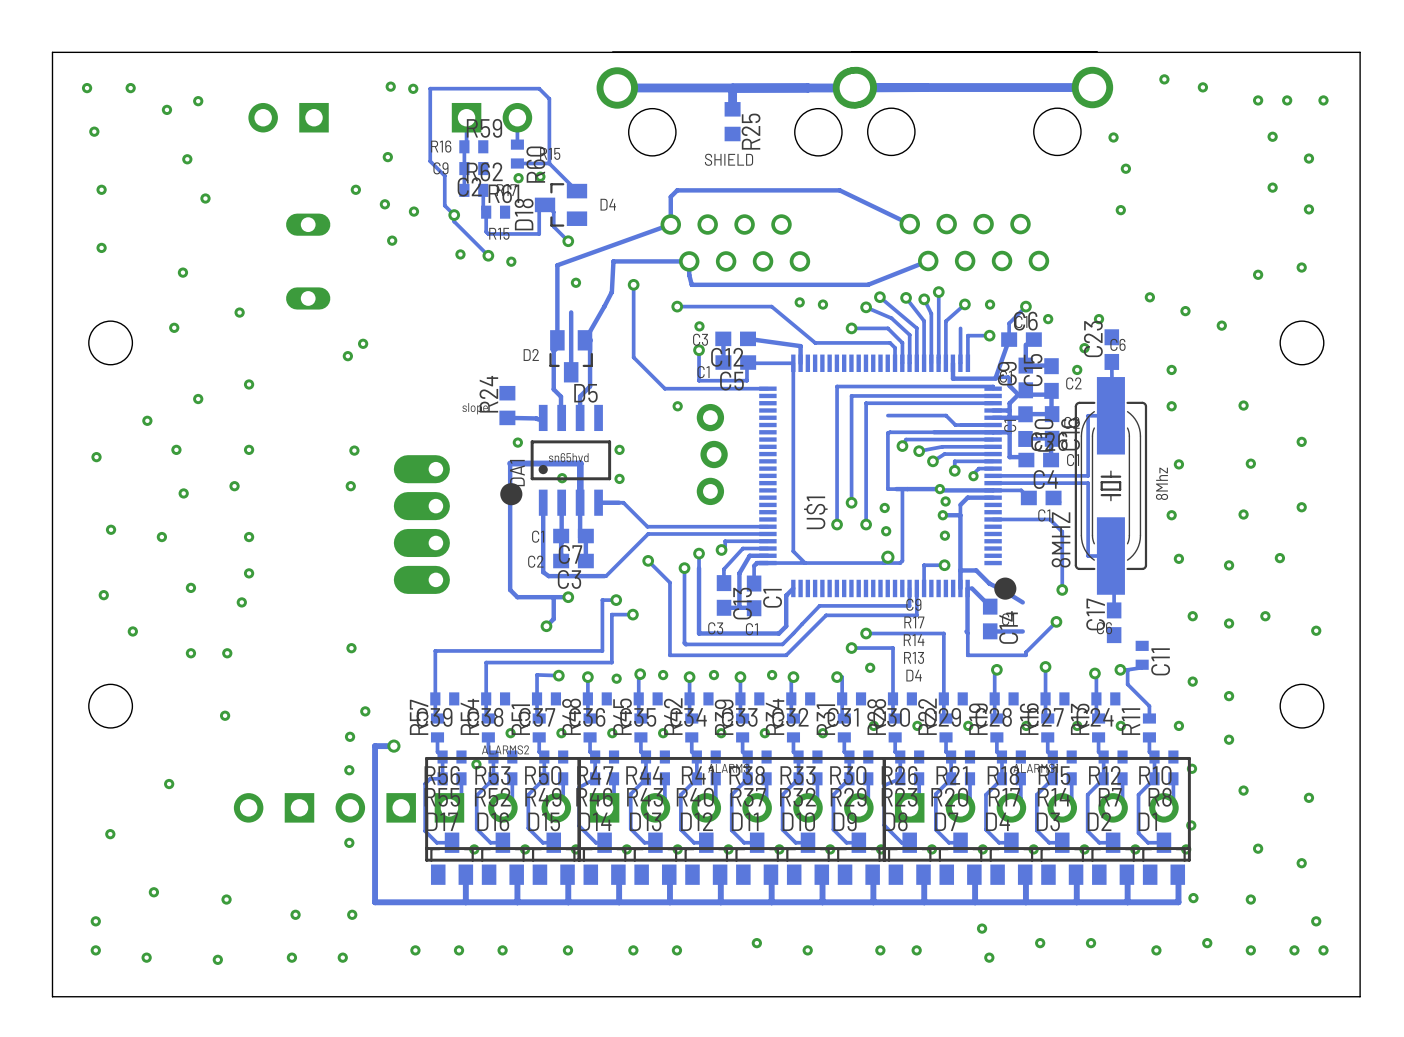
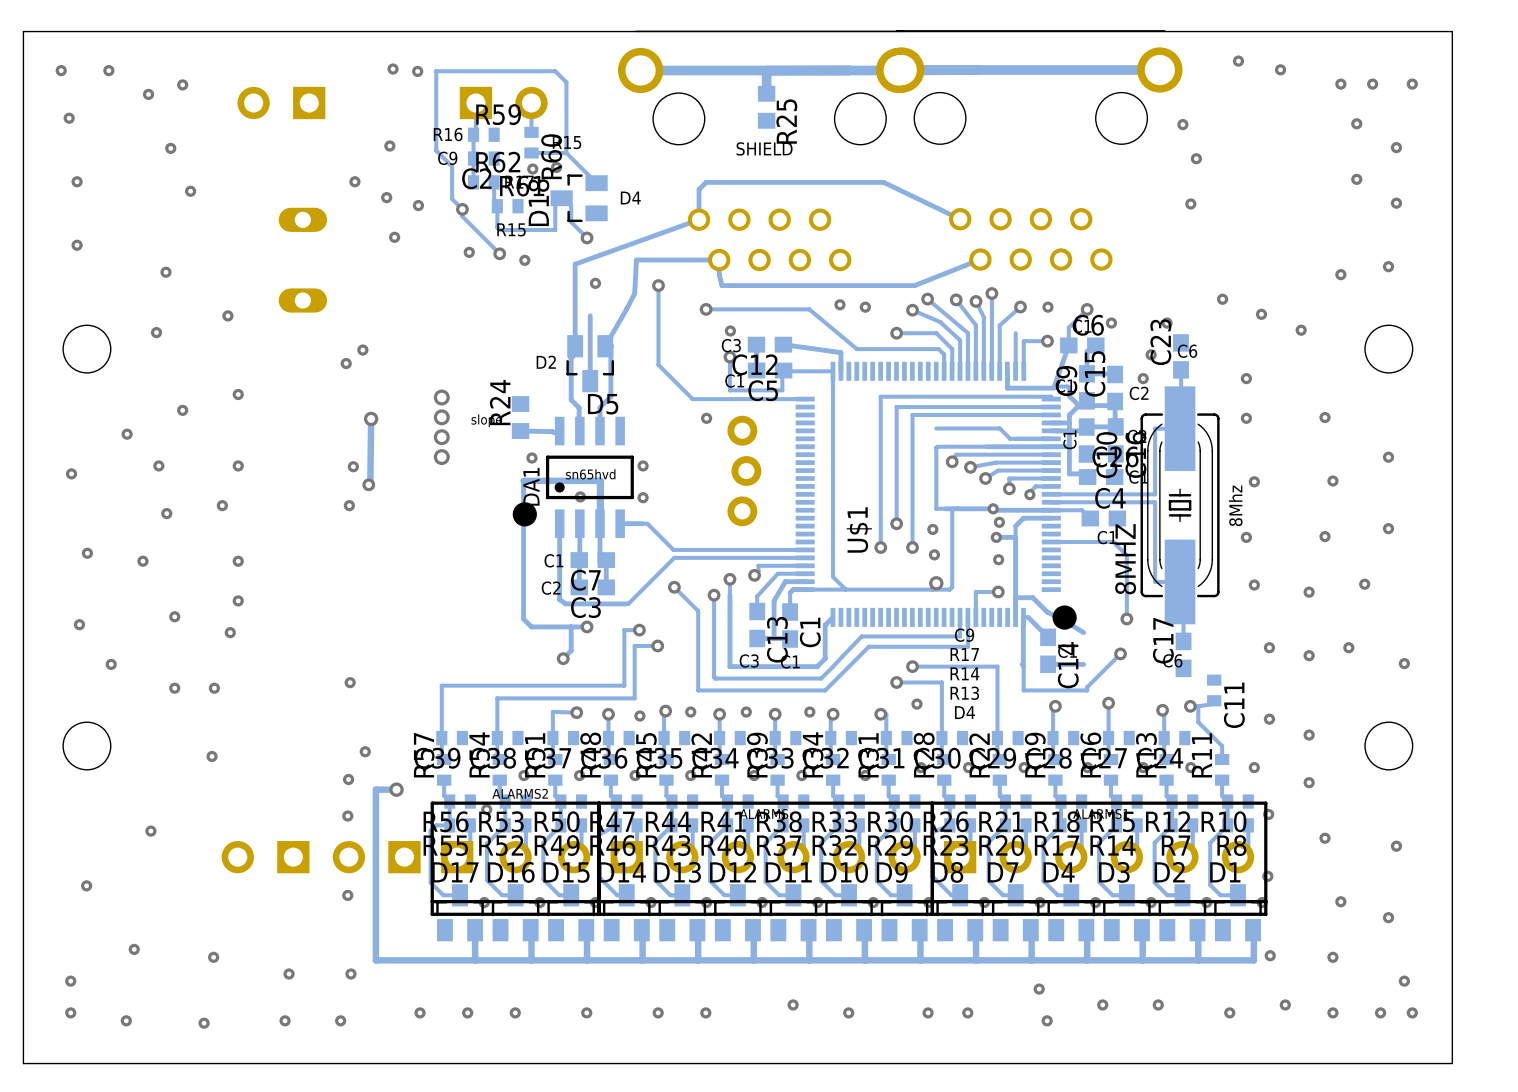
via: none -> (441, 397)
via: none -> (441, 417)
track: none -> (371, 418) (370, 484) (368, 484)
via: none -> (371, 418)
via: none -> (441, 437)
via: none -> (441, 457)
via: none -> (368, 484)
part: (421, 524) -> none

